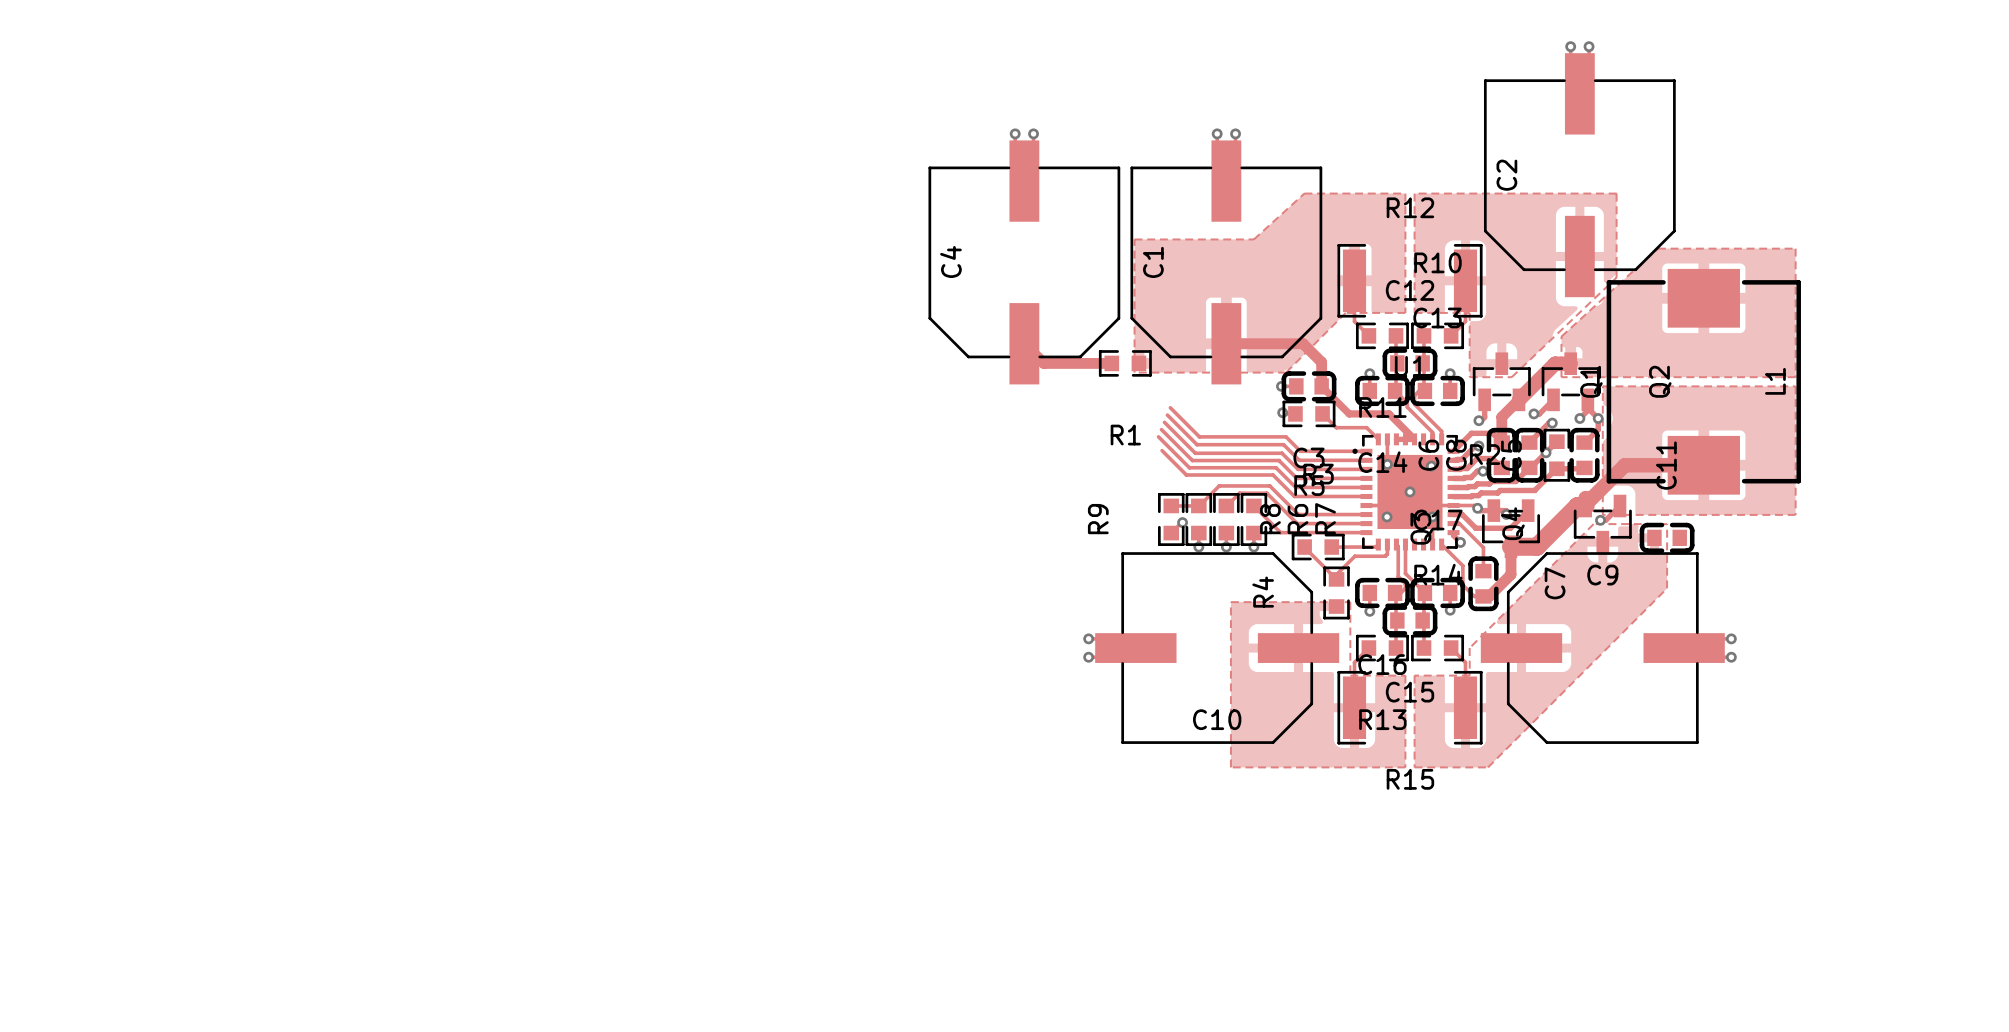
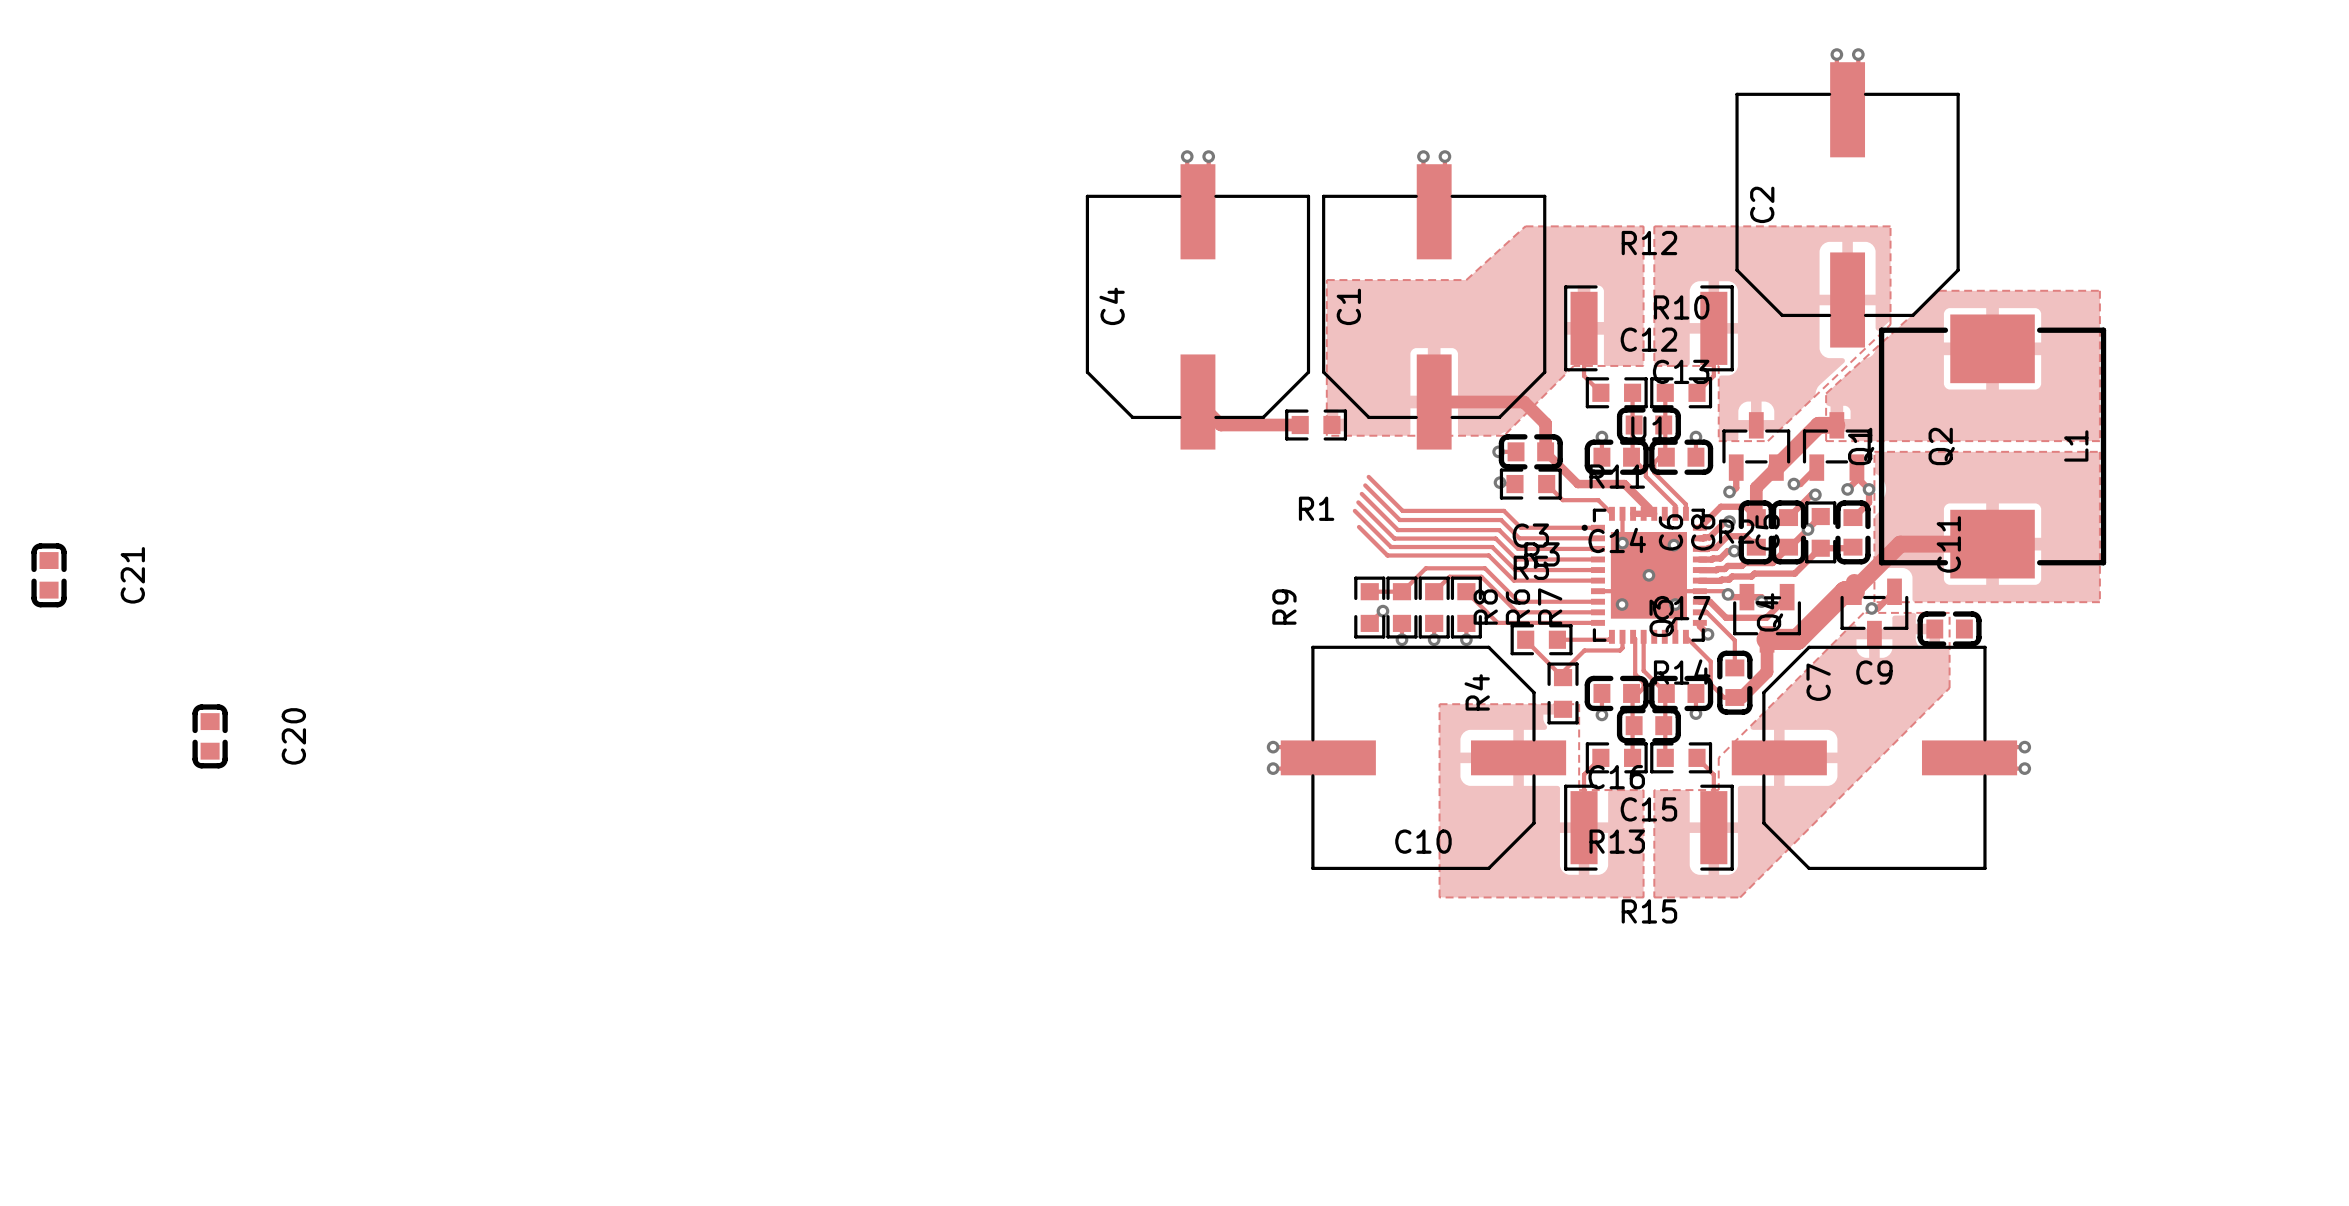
C21: none -> (49, 575)
C20: none -> (210, 736)

